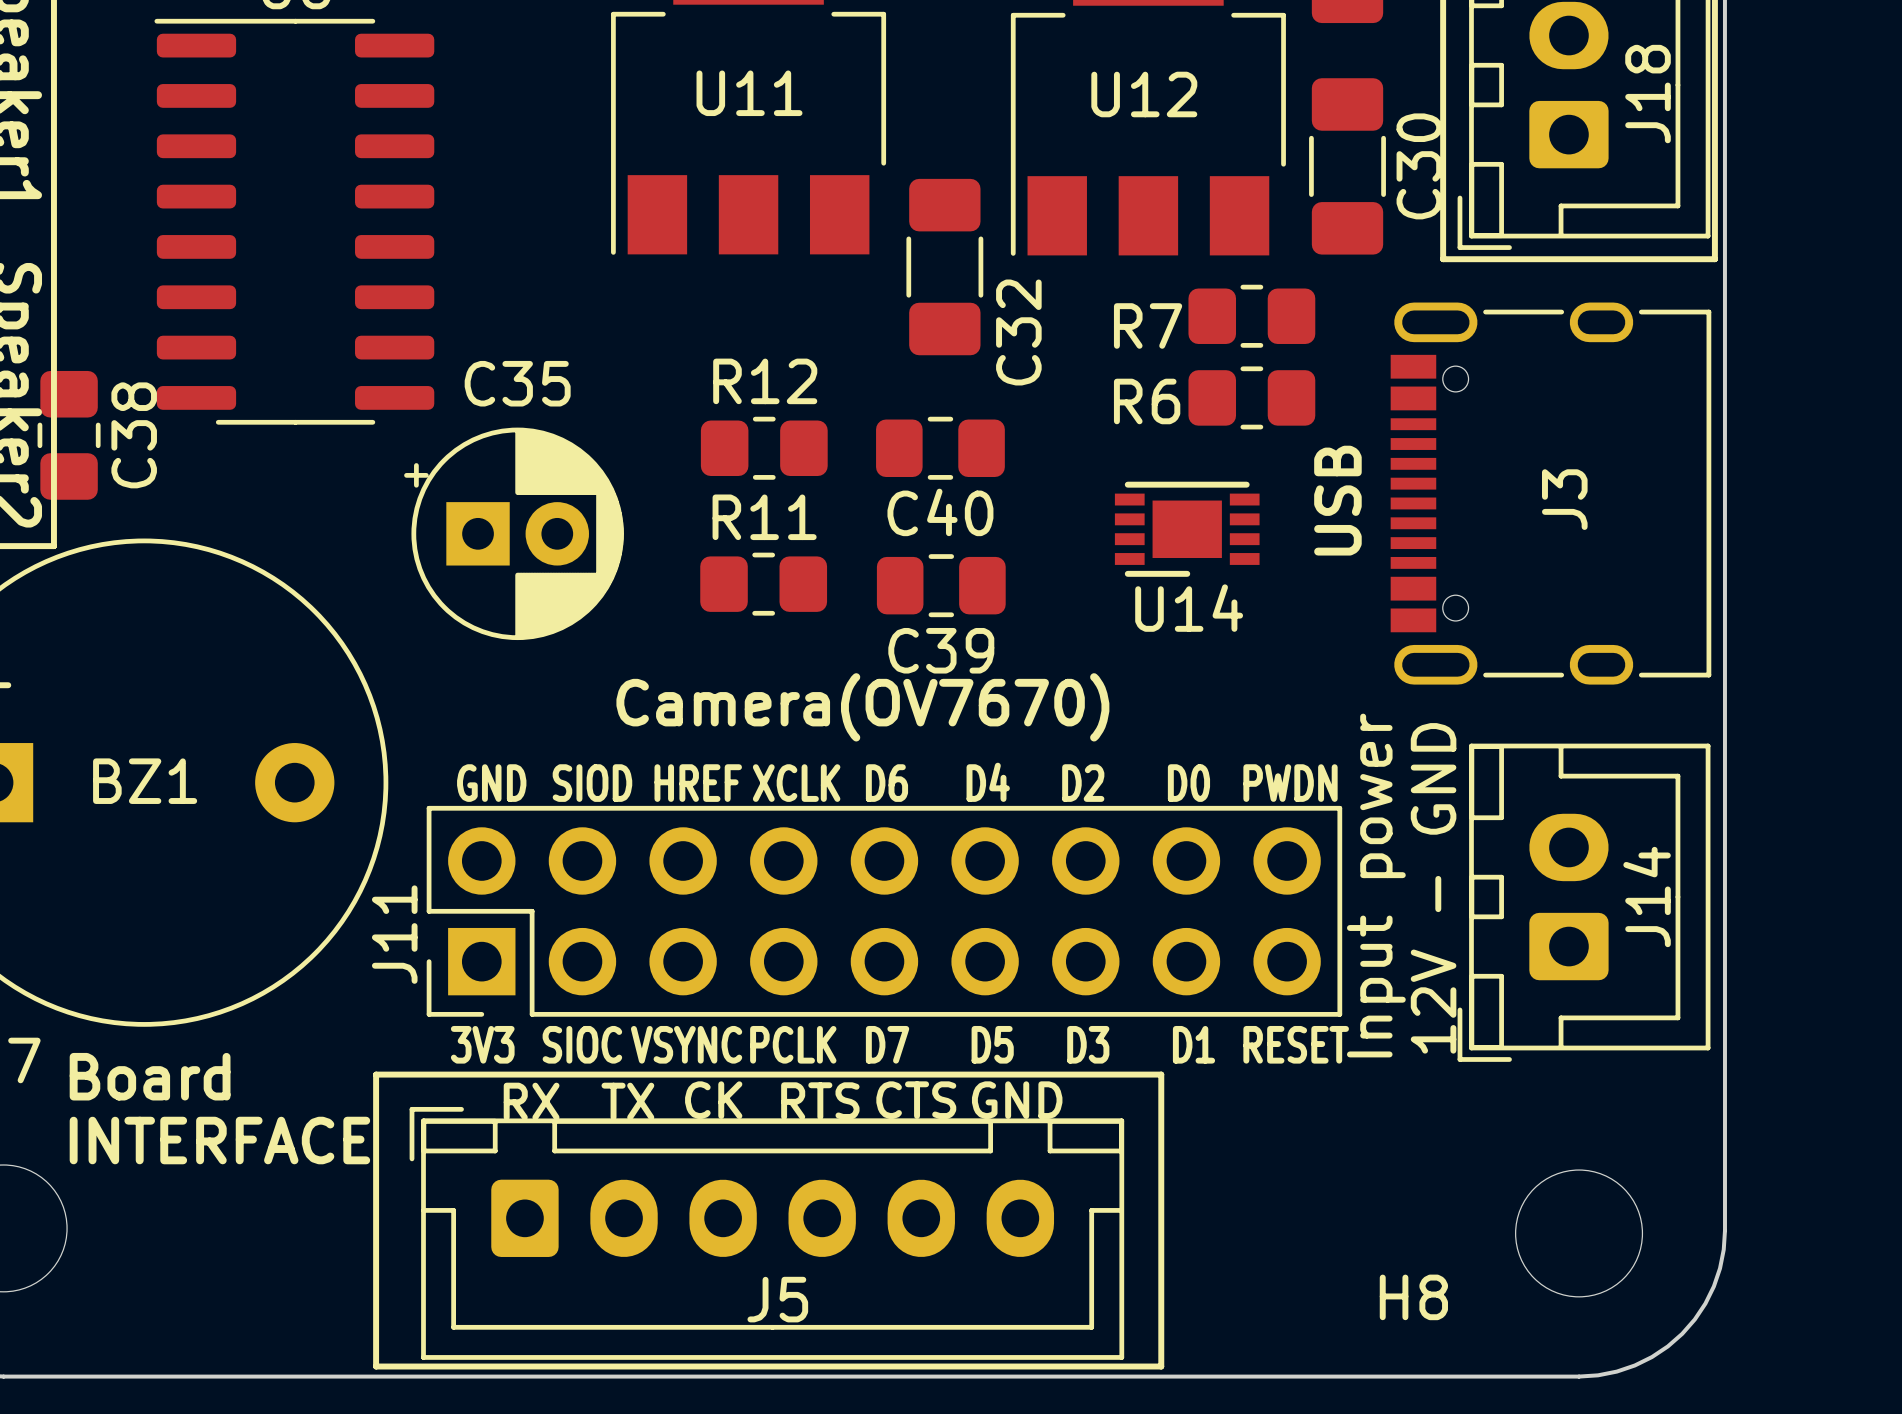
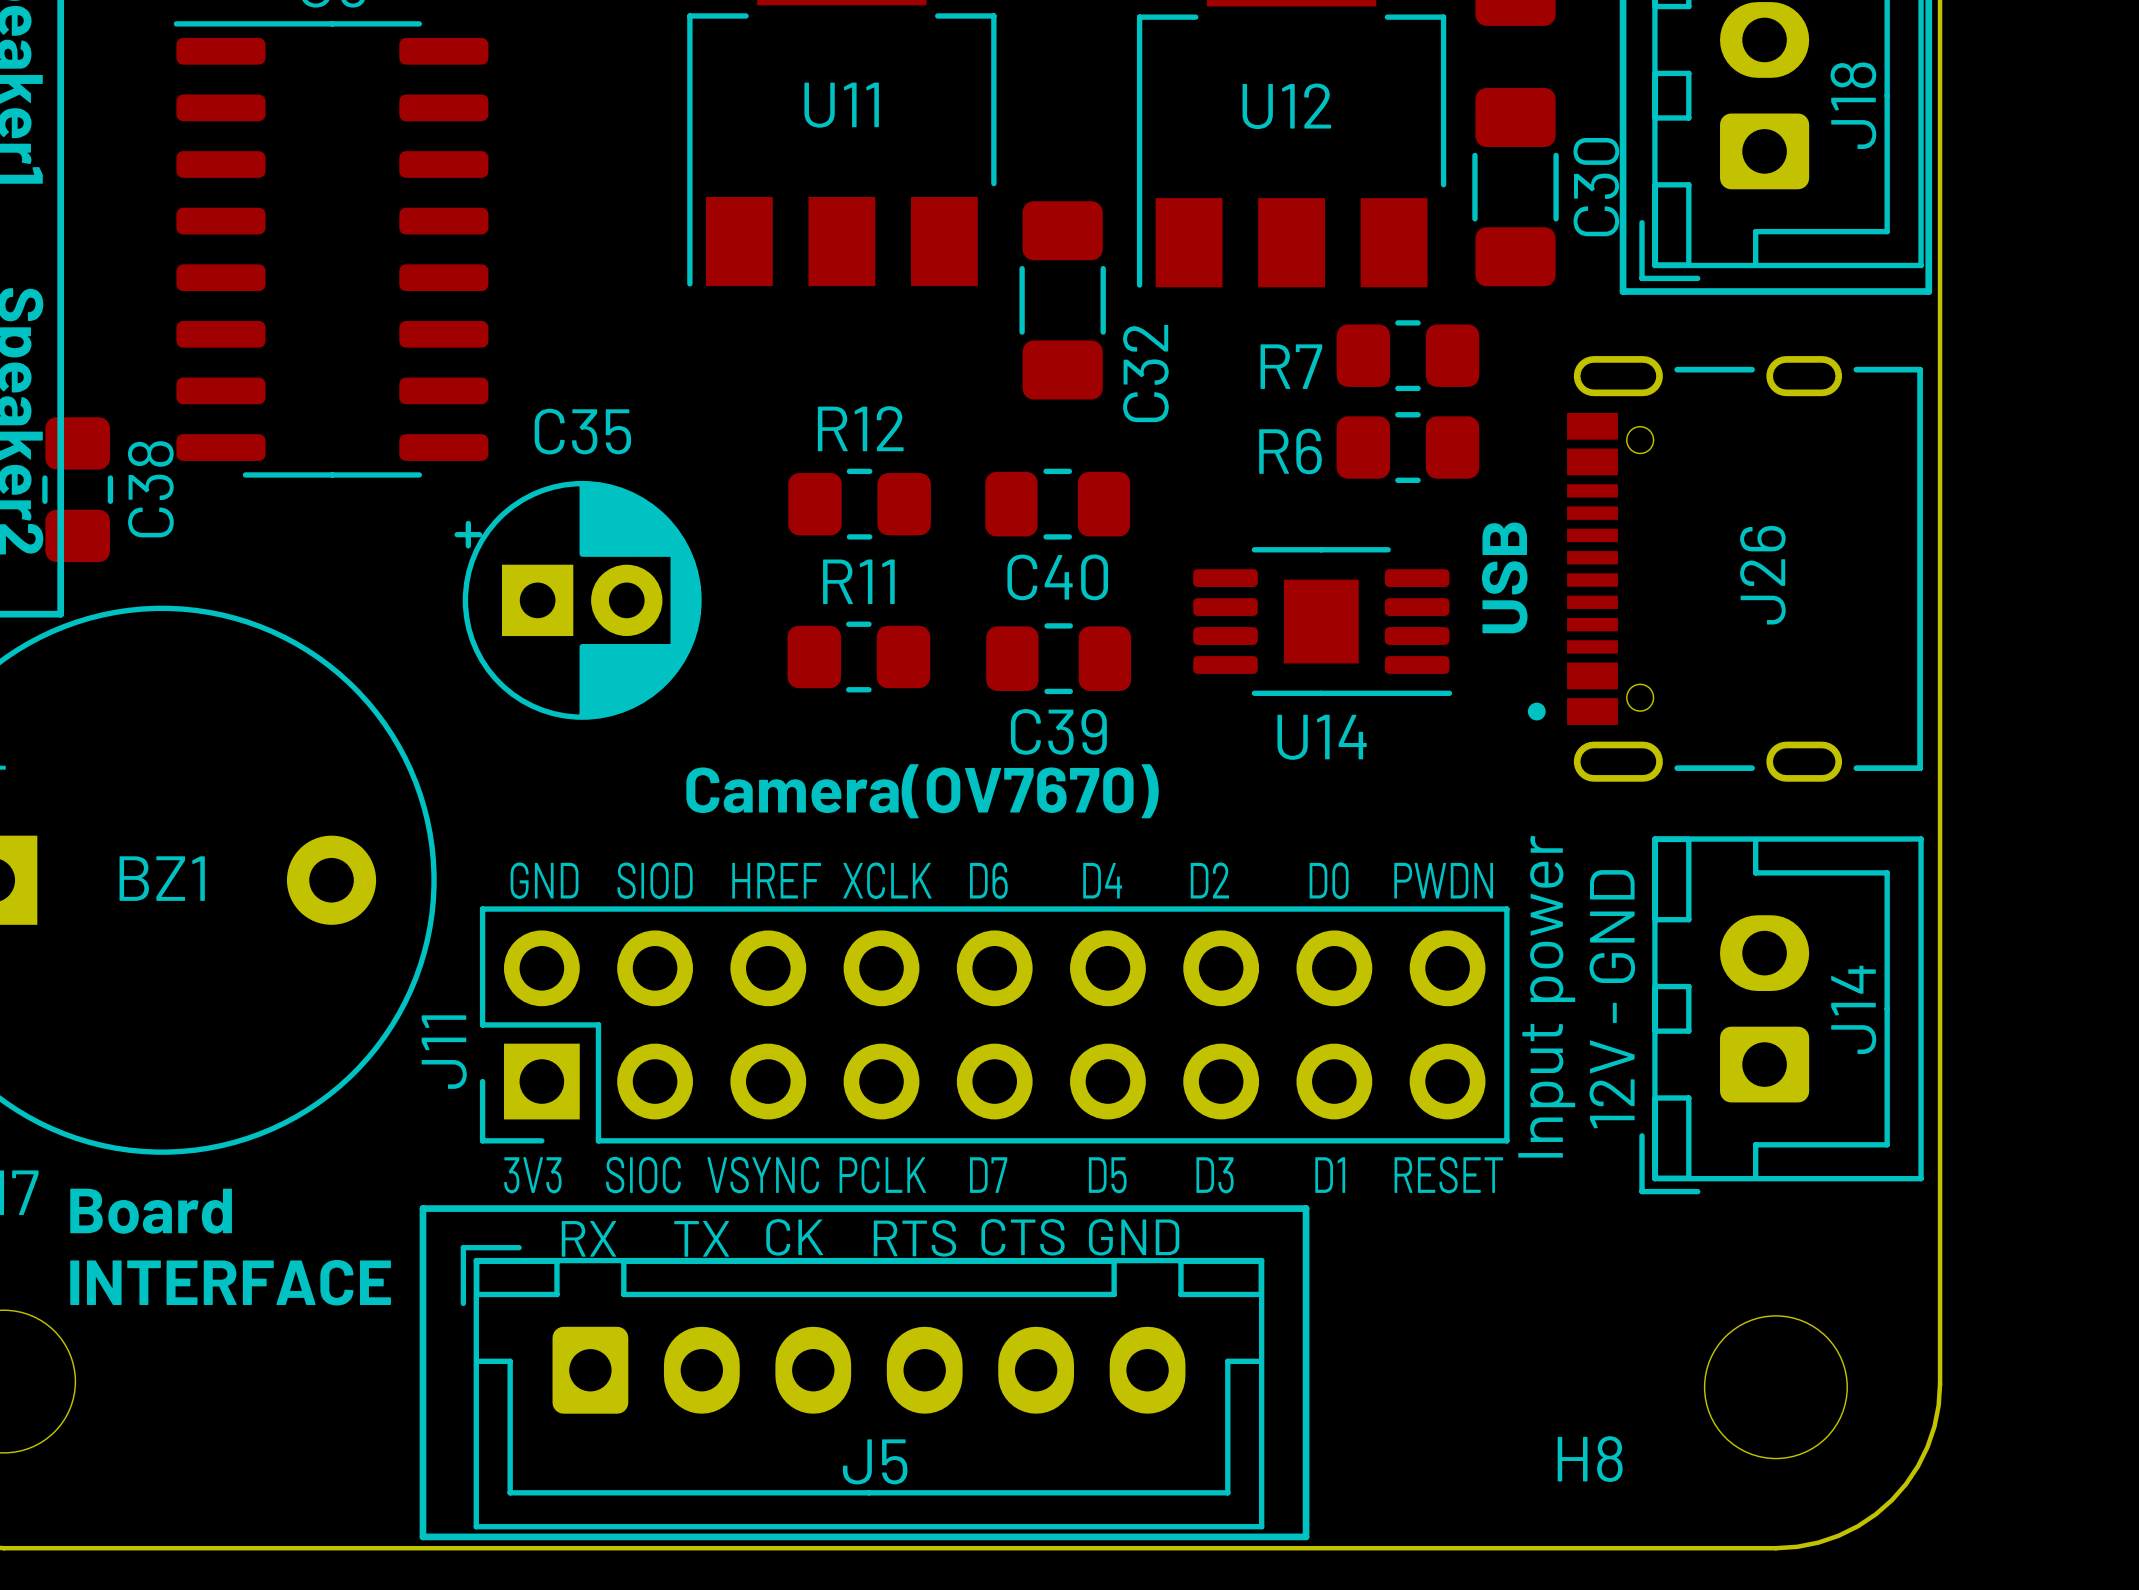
U14 footprint: [1114, 481, 1260, 577] -> [1193, 547, 1453, 696]
J3: (1550, 493) -> none
J26: none -> (1725, 568)

